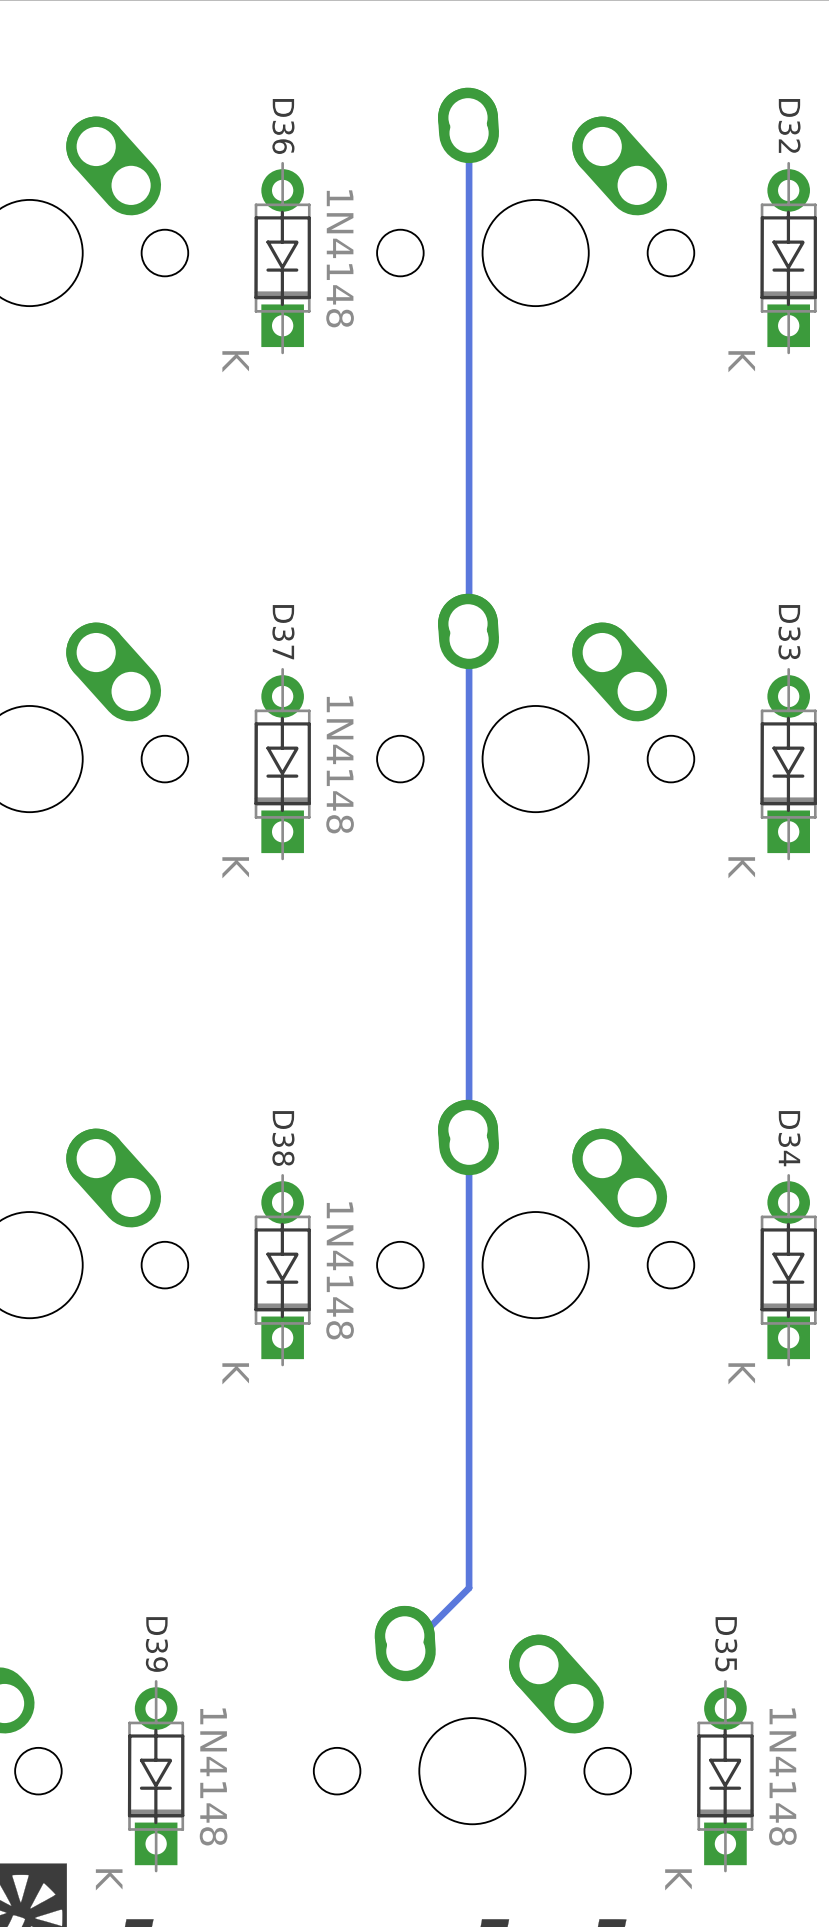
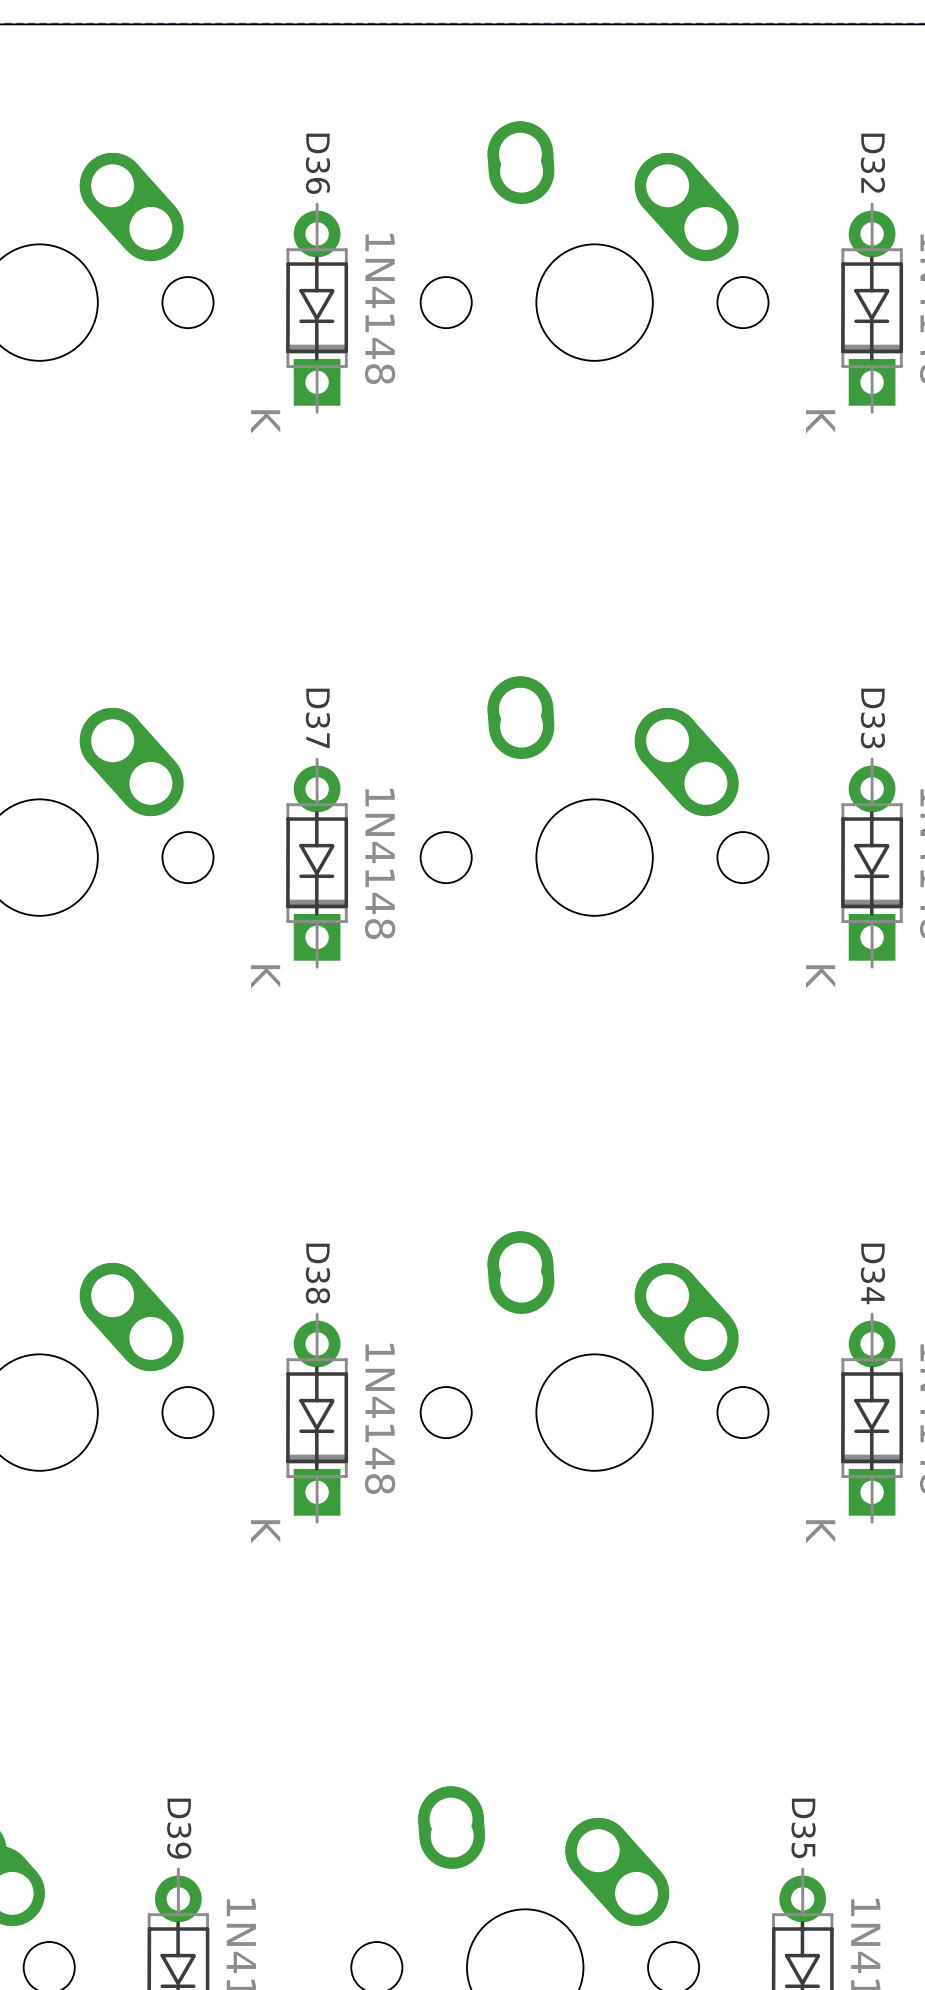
track: (469, 133) (468, 623) -> none
track: (469, 639) (468, 1129) -> none
track: (469, 1145) (469, 1588) (405, 1651) -> none

